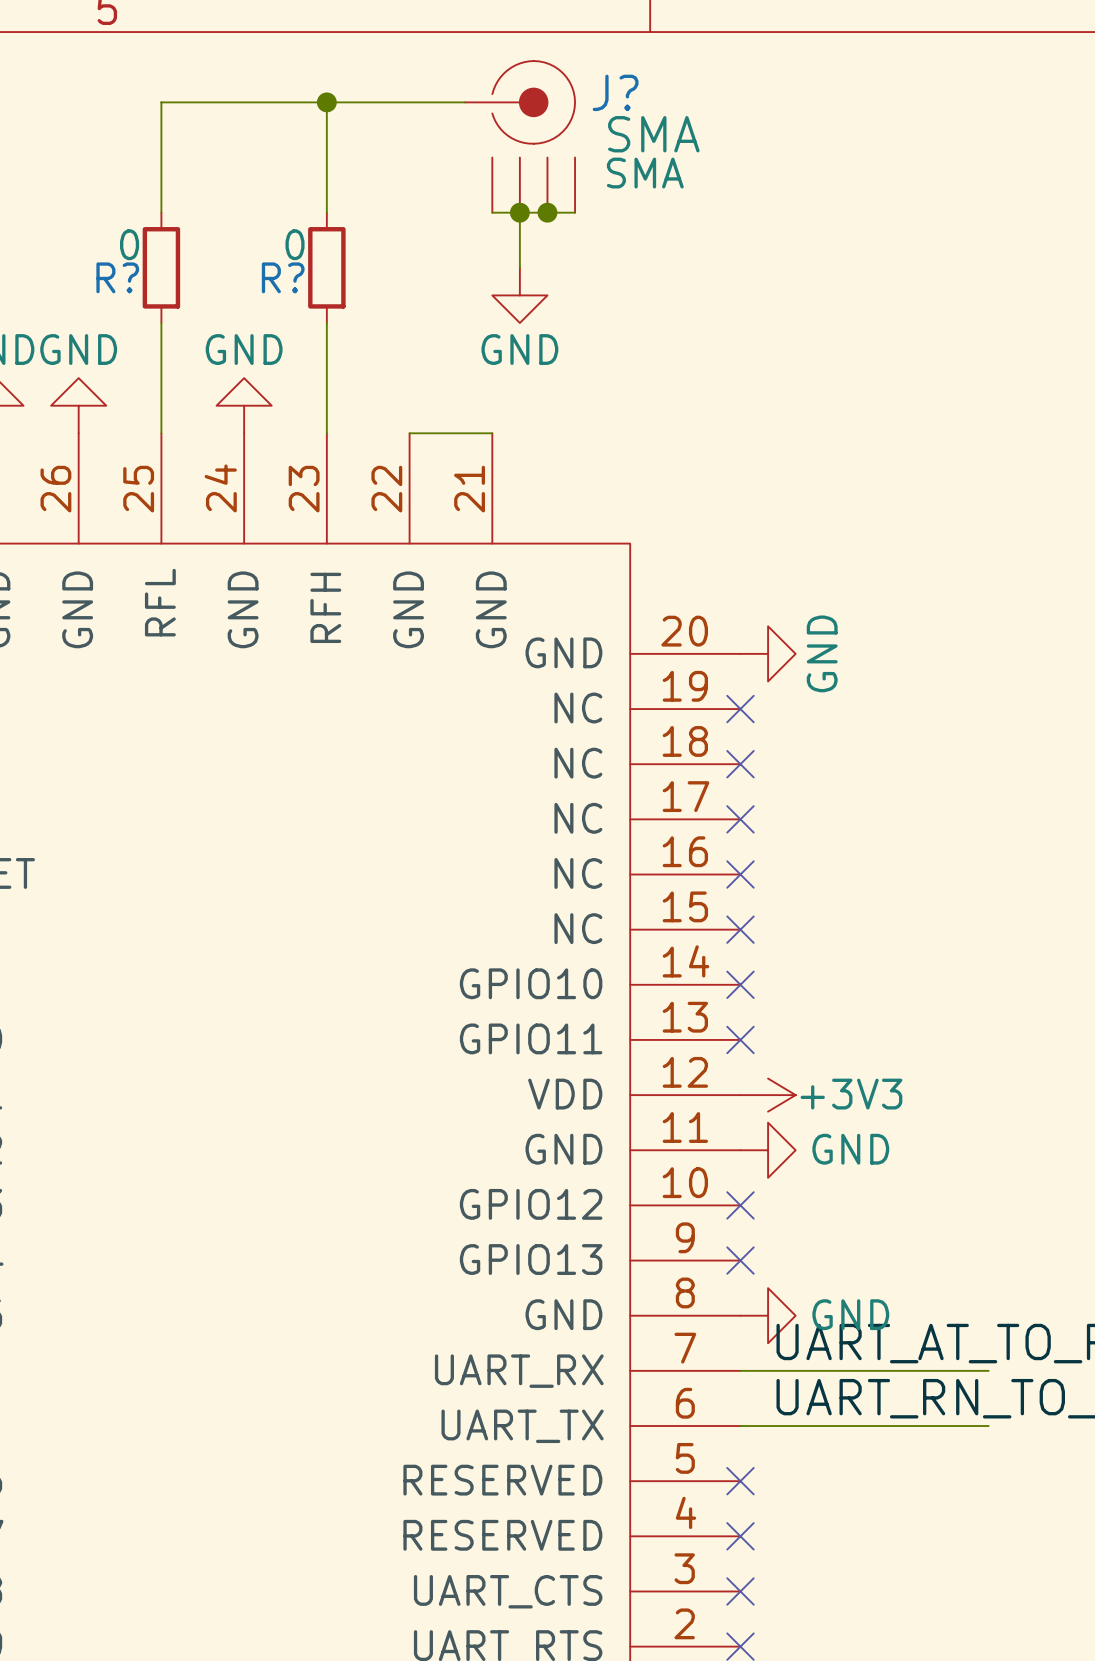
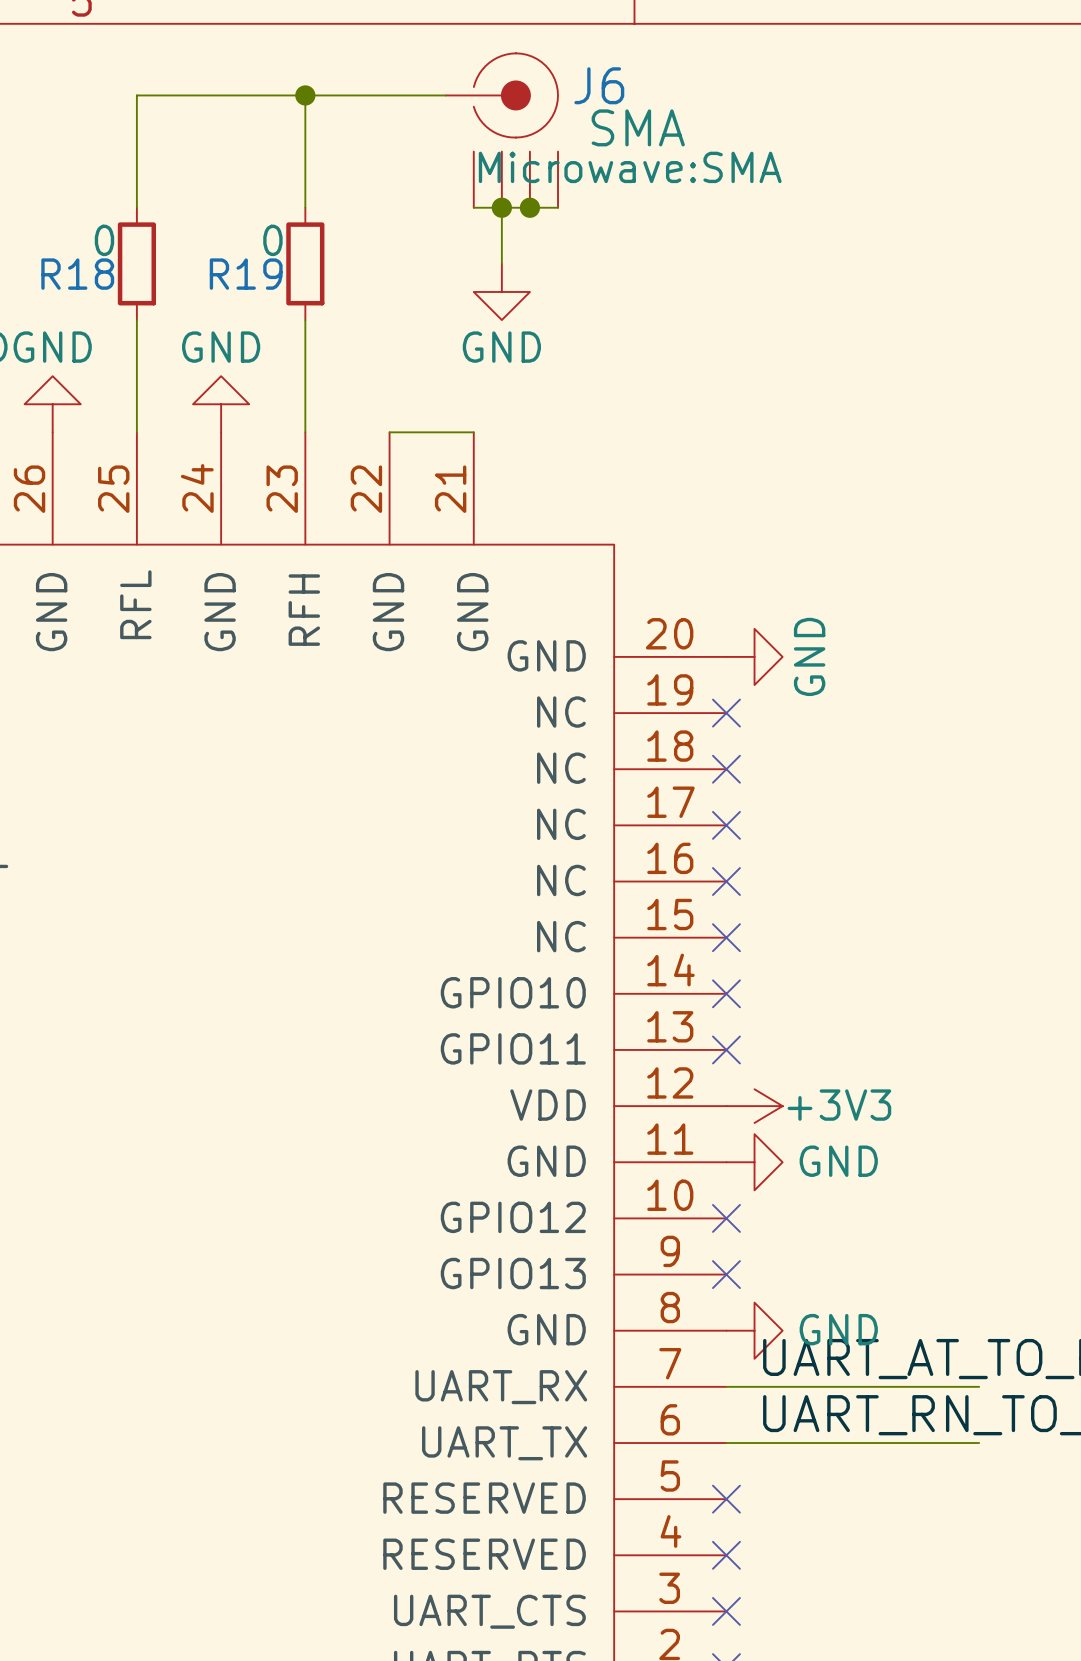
J? name: J? (615, 92) -> J6 (599, 85)
J? text: SMA (645, 173) -> Microwave:SMA (630, 167)
R? name: R? (117, 277) -> R18 (77, 274)
R? name: R? (283, 277) -> R19 (246, 274)

